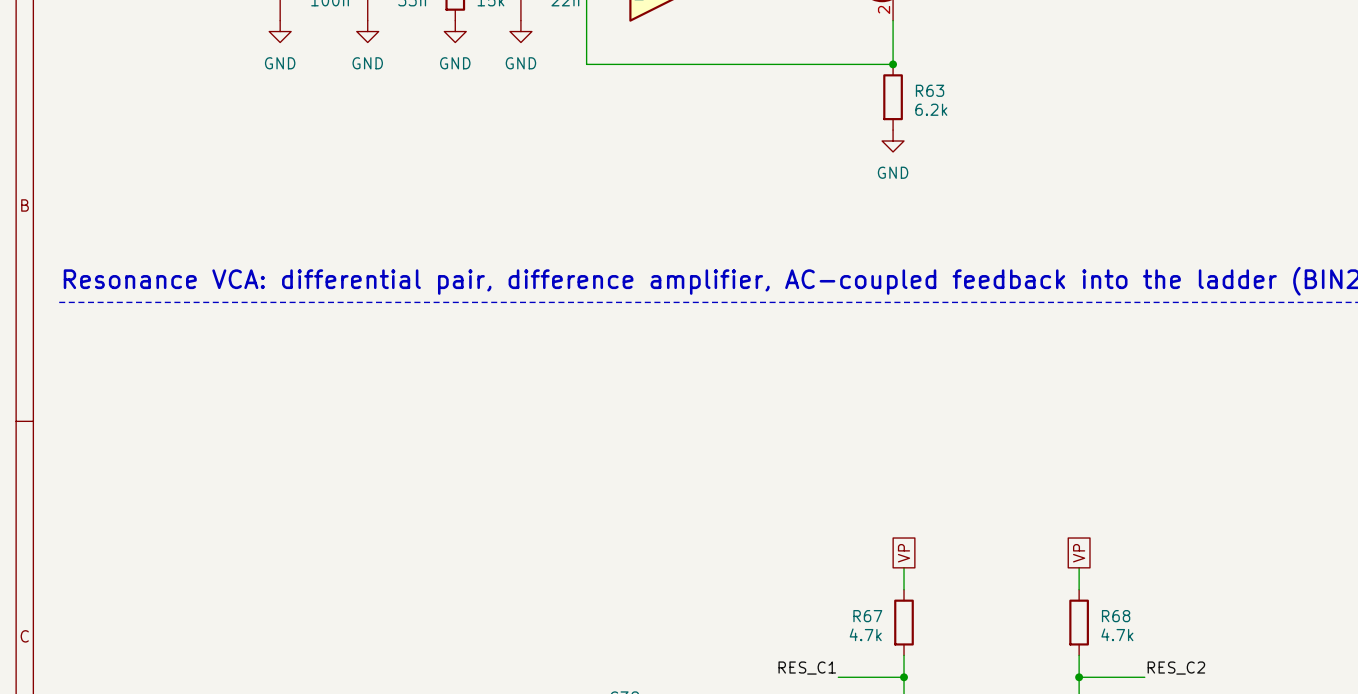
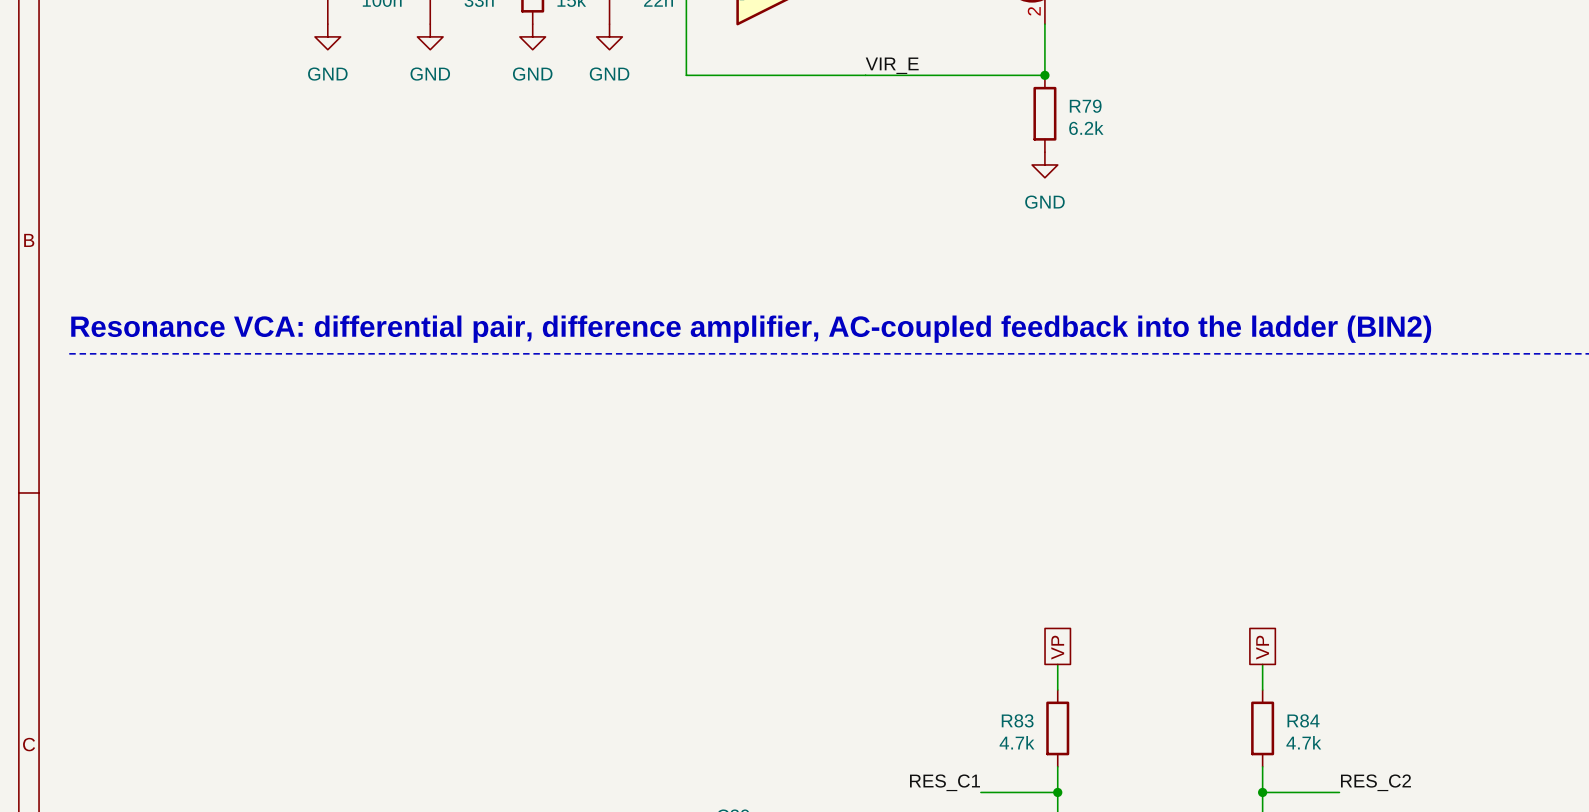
label: none -> VIR_E (892, 65)
R63 name: R63 (930, 90) -> R79 (1085, 106)
R67 name: R67 (867, 616) -> R83 (1017, 720)
R68 name: R68 (1116, 616) -> R84 (1303, 720)

